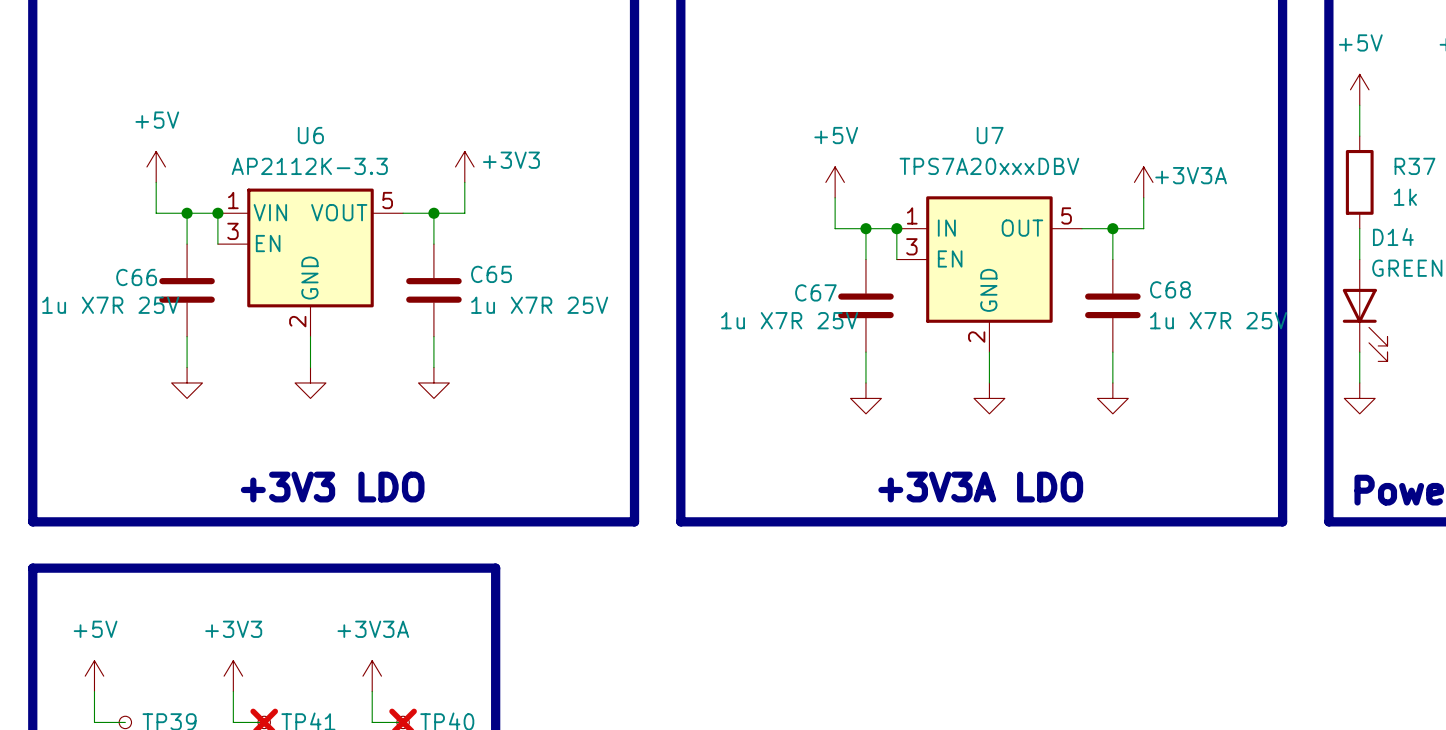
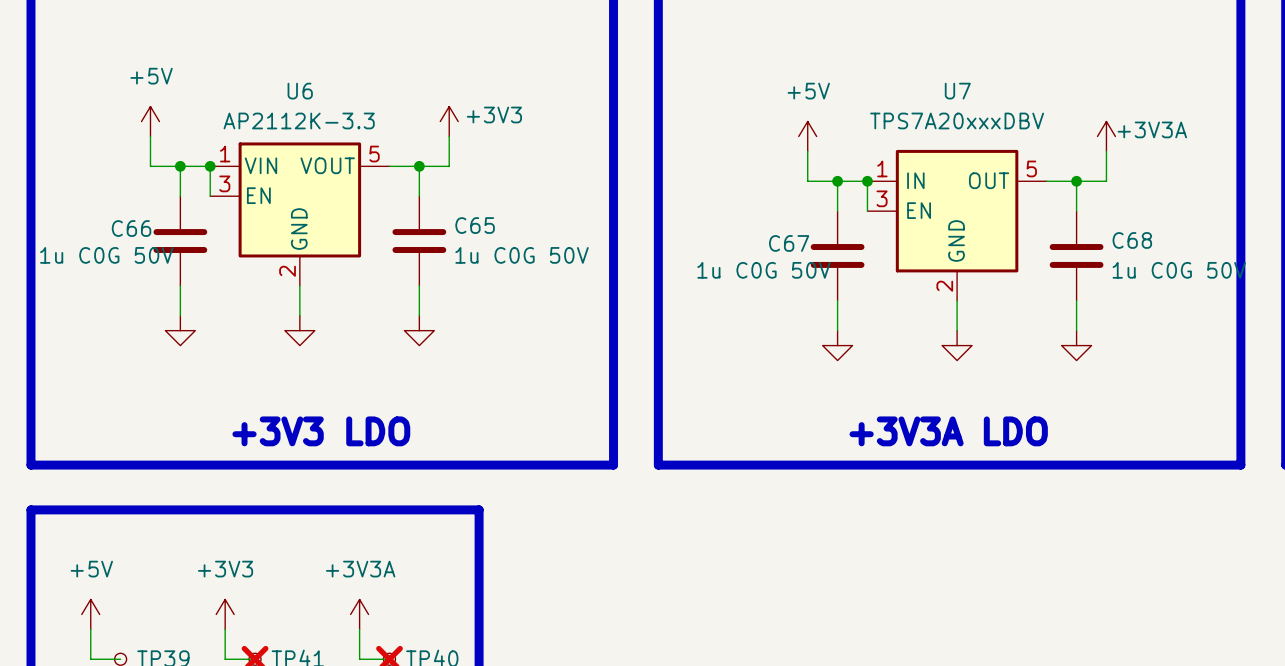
C66 value: 1u X7R 25V (110, 305) -> 1u C0G 50V (106, 255)
C65 value: 1u X7R 25V (539, 305) -> 1u C0G 50V (522, 255)
C67 value: 1u X7R 25V (789, 320) -> 1u C0G 50V (764, 270)
C68 value: 1u X7R 25V (1218, 320) -> 1u C0G 50V (1179, 270)

